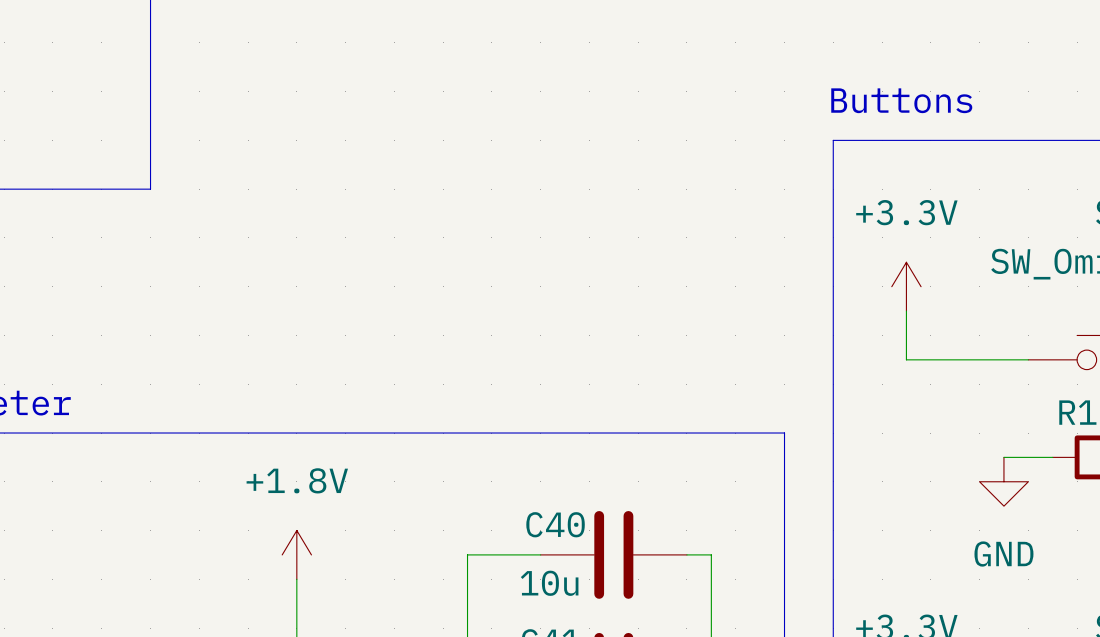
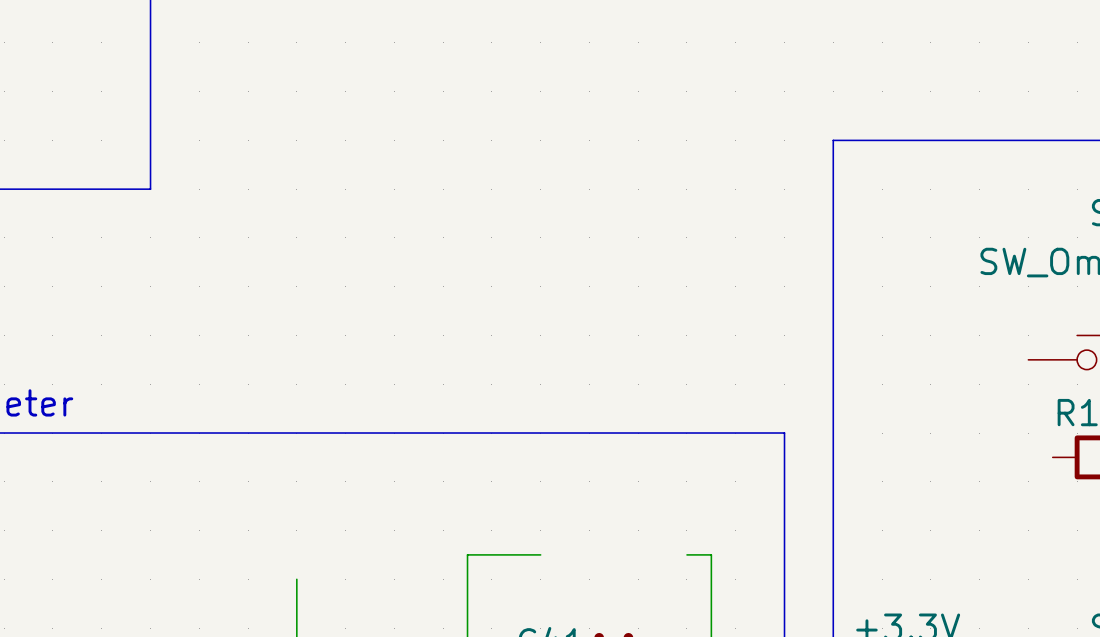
text: Buttons (901, 100) -> none
power symbol: +3.3V (906, 286) -> none
wire: (906, 311) (906, 359) (1028, 359) -> none
wire: (1003, 457) (1052, 457) -> none
power symbol: GND (1003, 481) -> none
power symbol: +1.8V (296, 554) -> none
C40: 10u (613, 554) -> none

